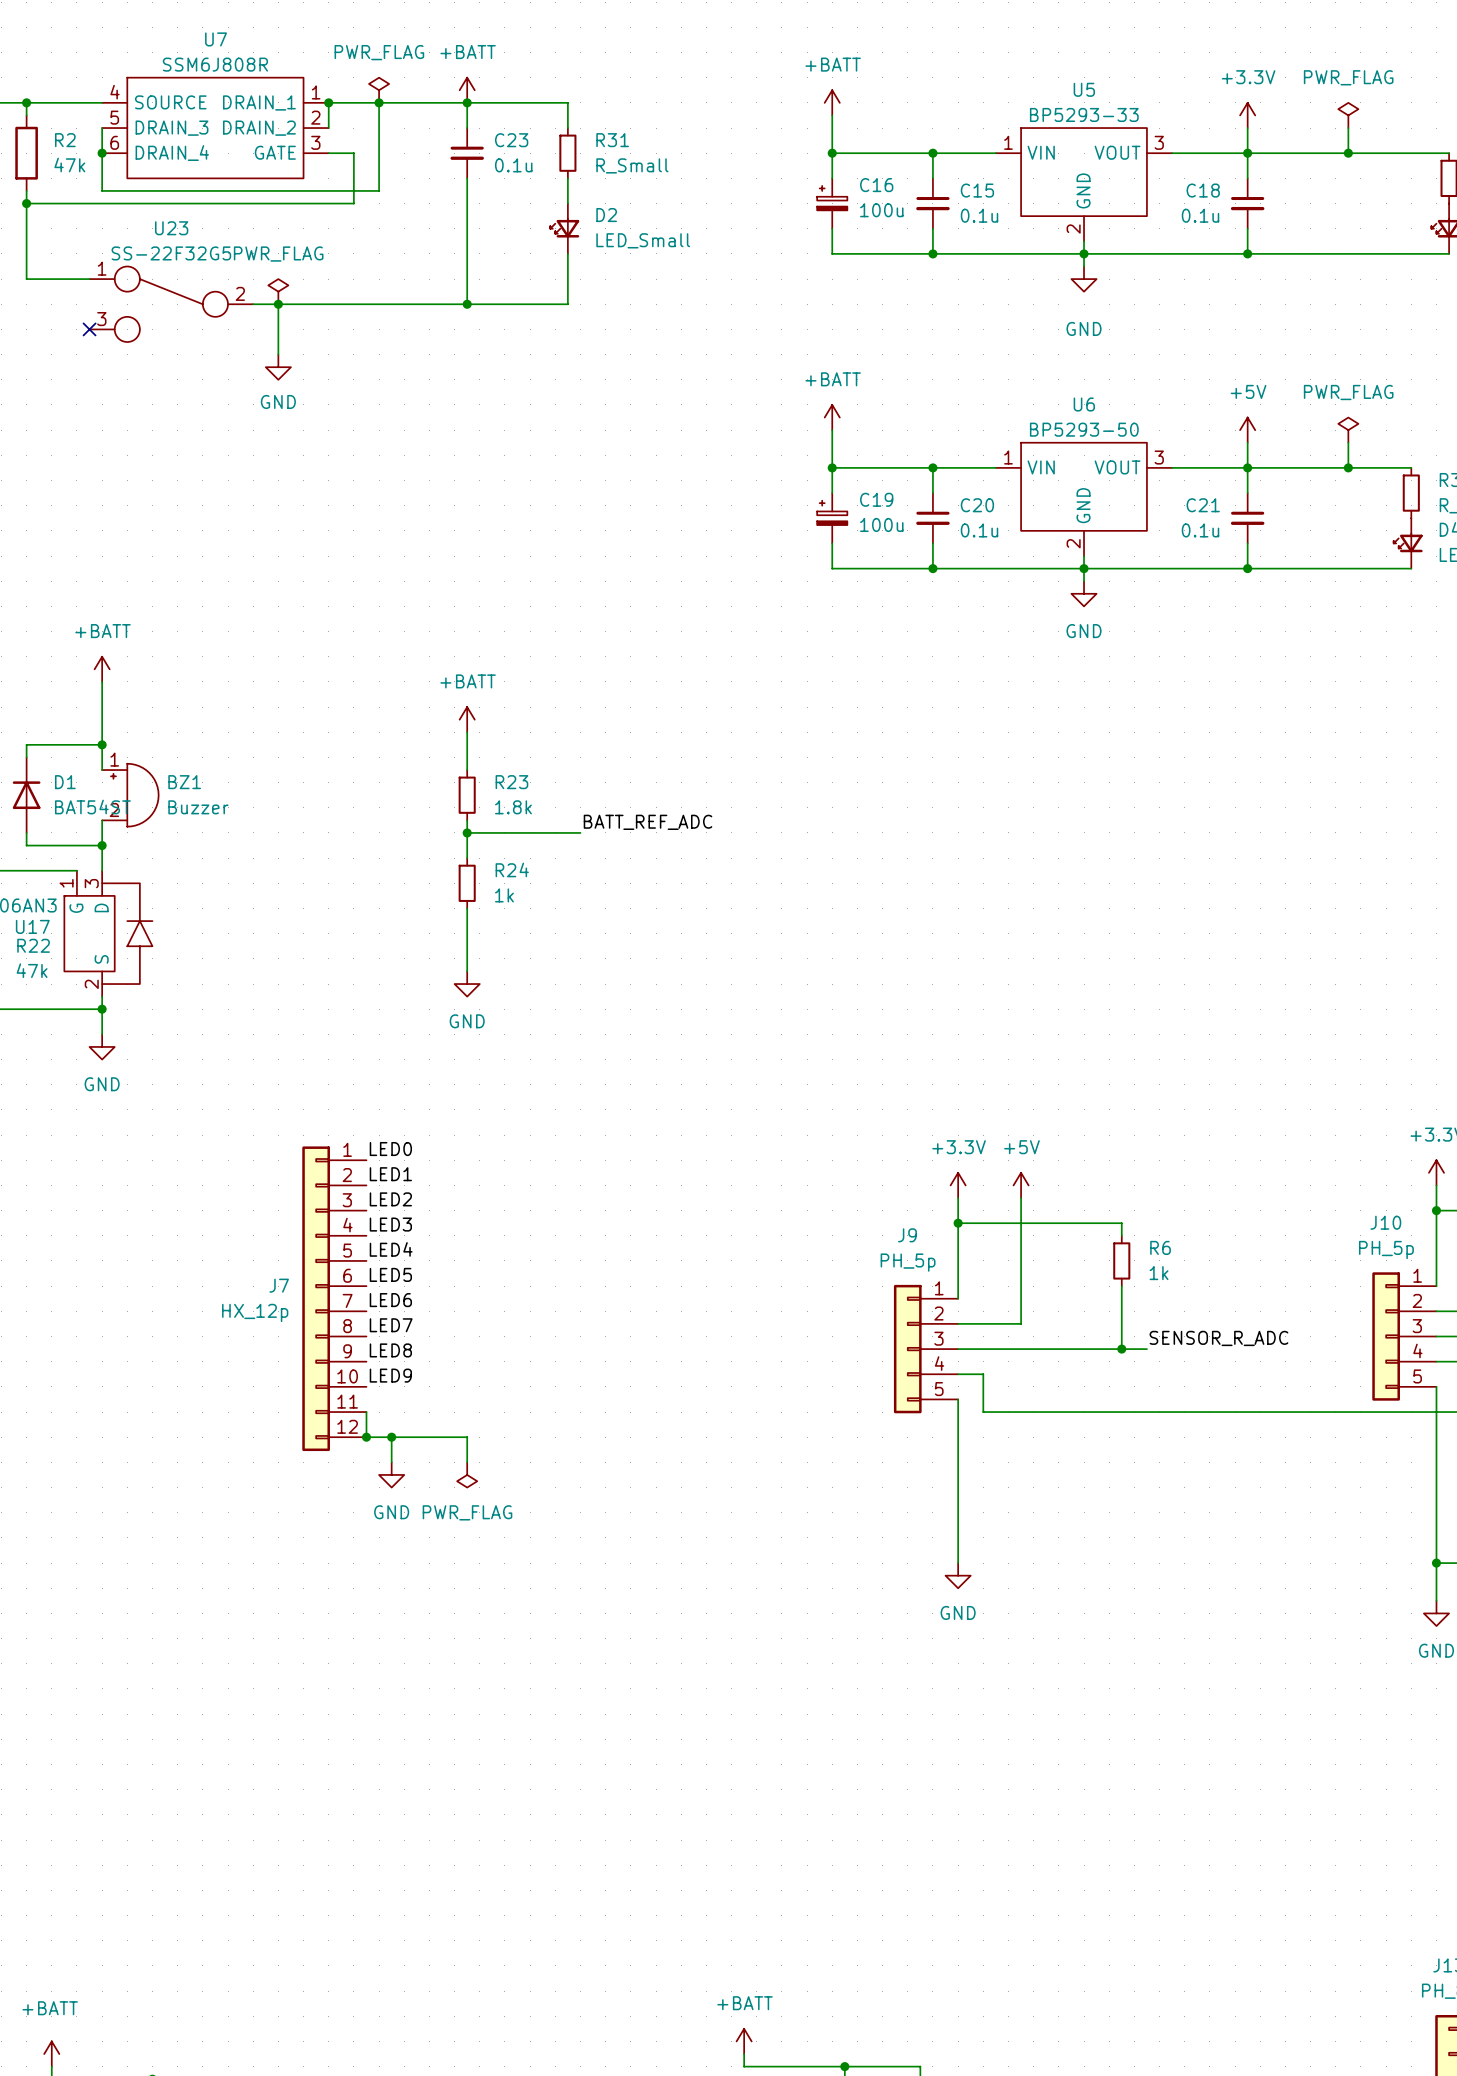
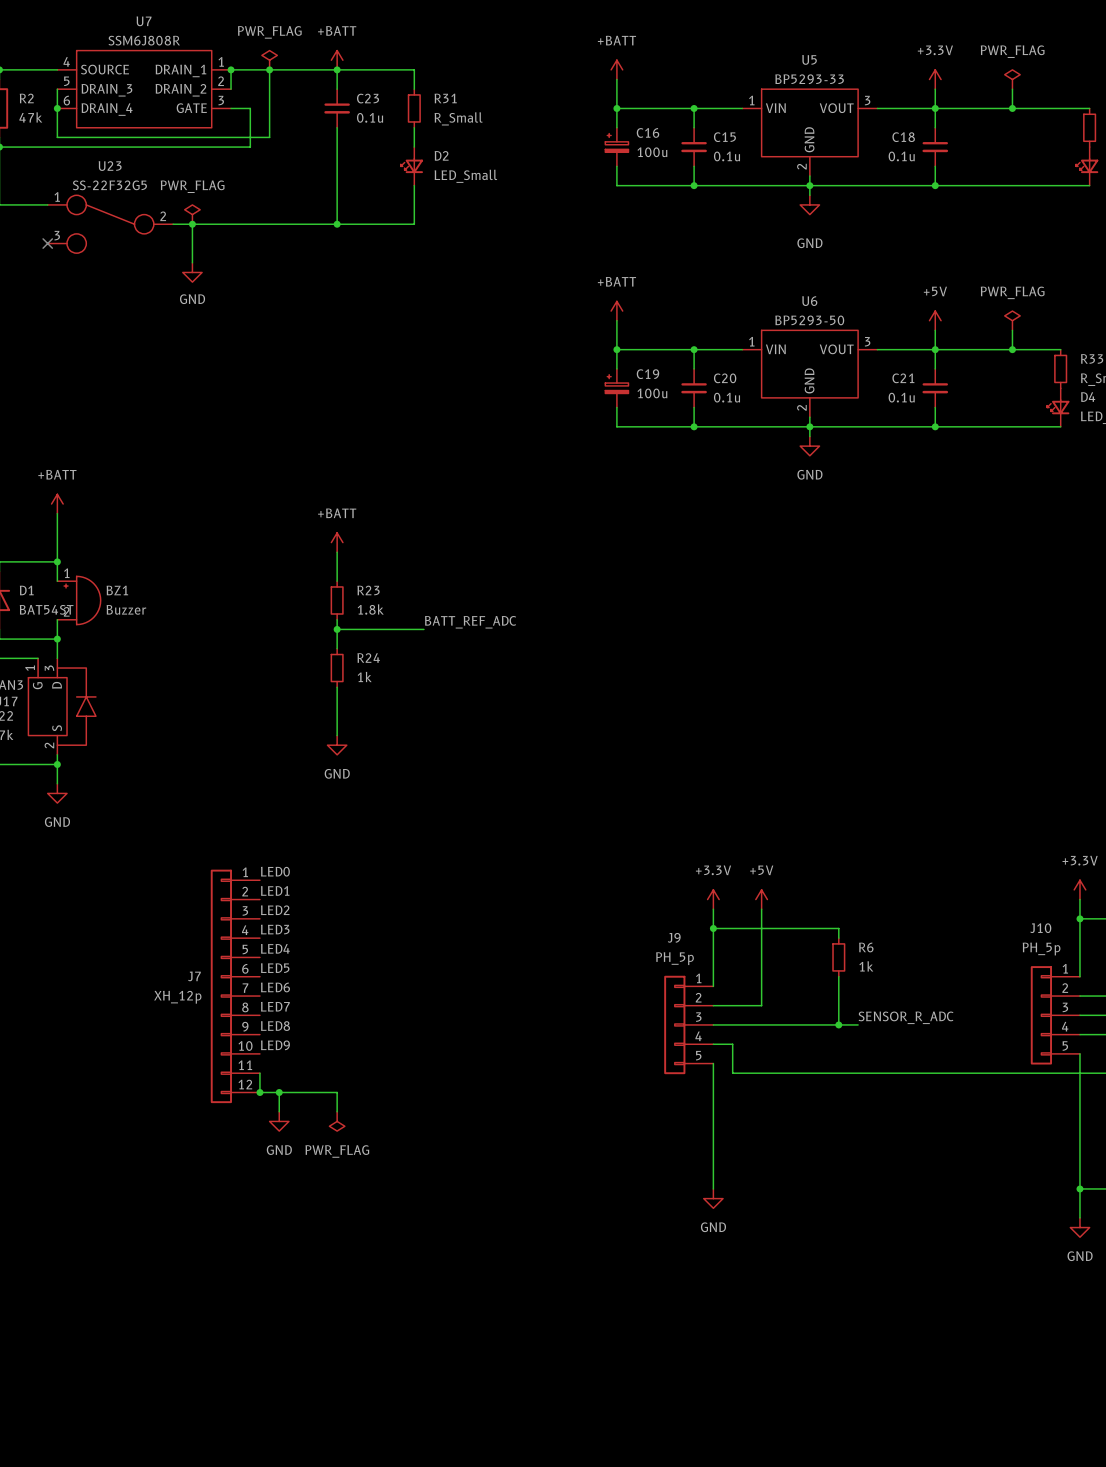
J7 value: HX_12p (255, 1312) -> XH_12p (177, 997)

